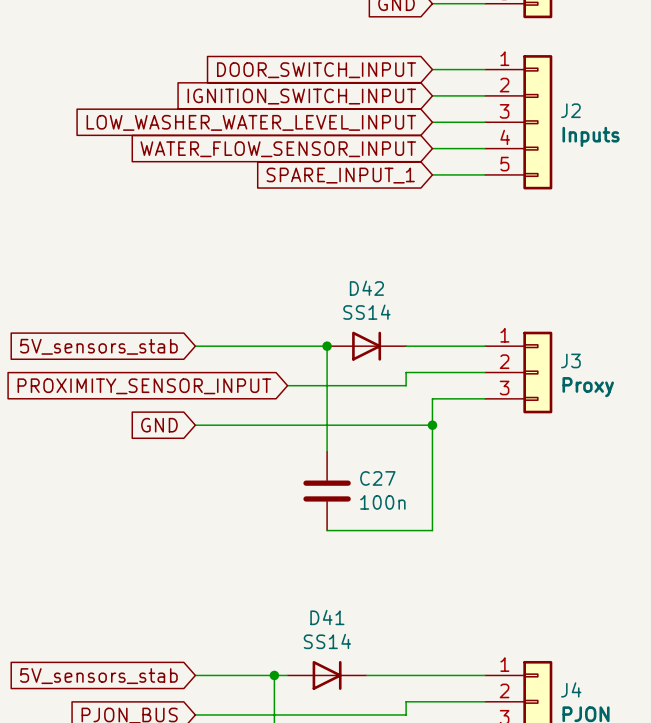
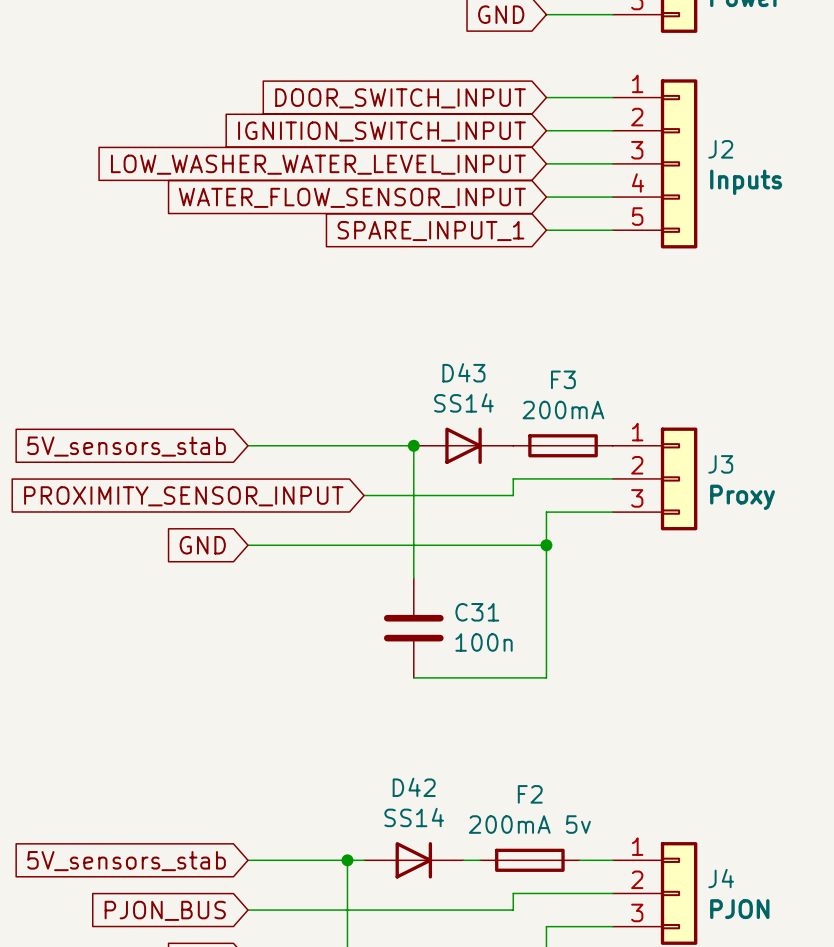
D42 name: D42 (366, 288) -> D43 (463, 372)
F3: none -> 200mA (563, 445)
C27 name: C27 (377, 478) -> C31 (477, 612)
D41 name: D41 (327, 617) -> D42 (414, 787)
F2: none -> 200mA 5v (529, 860)

